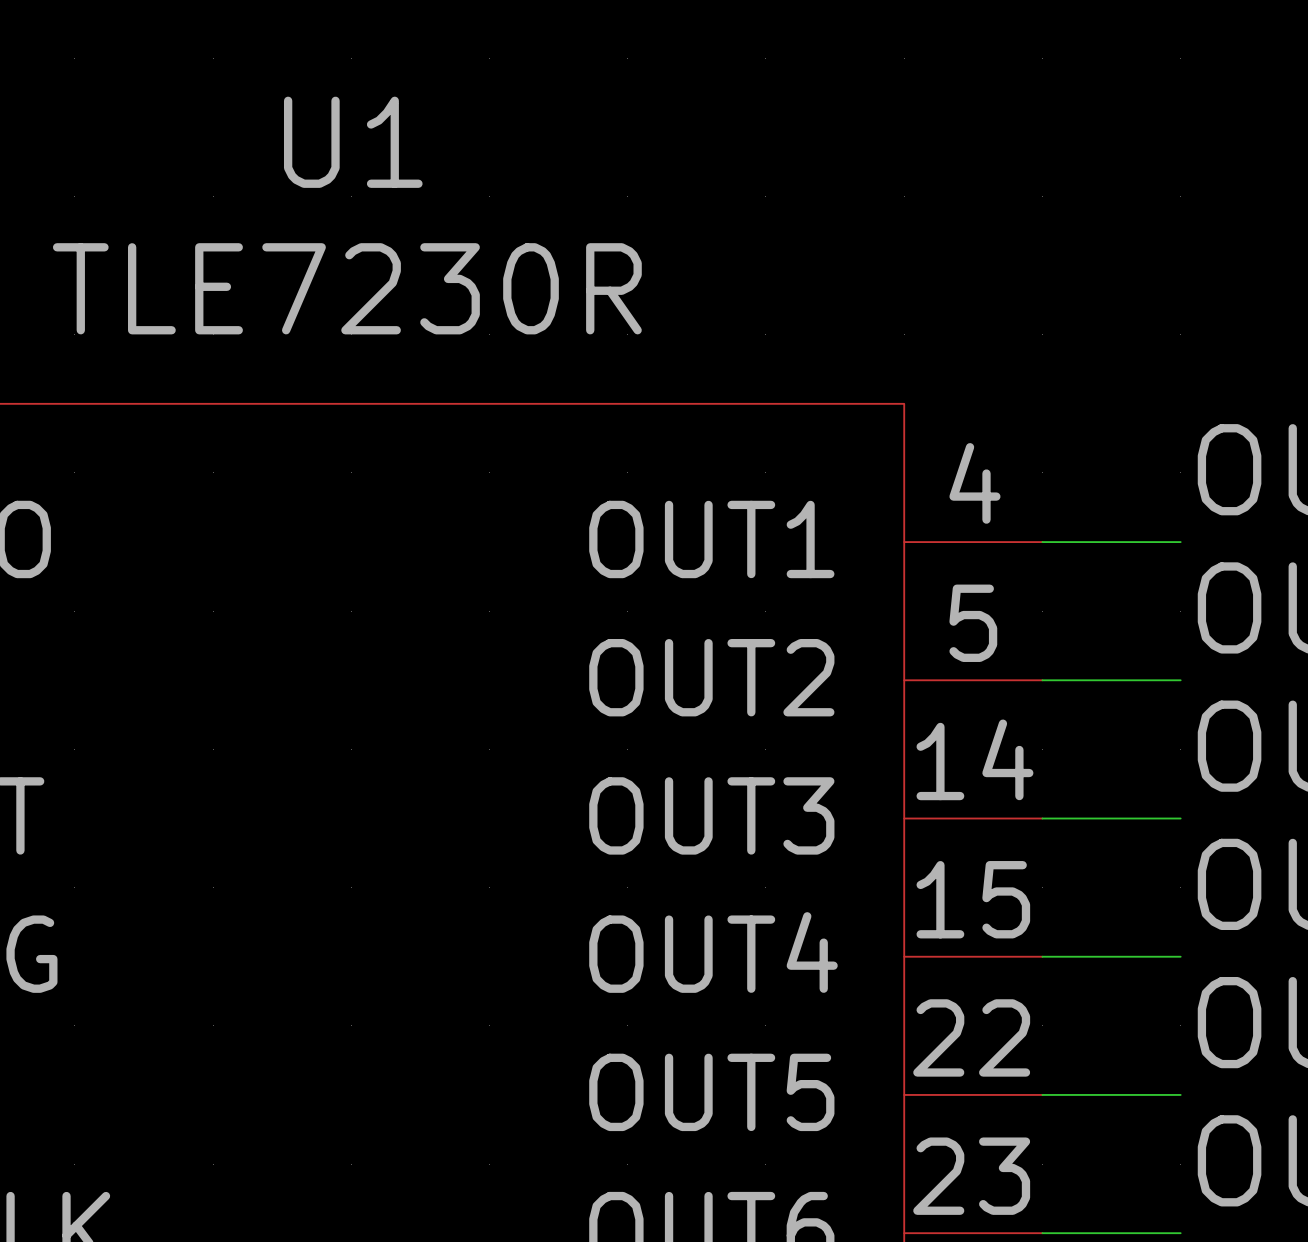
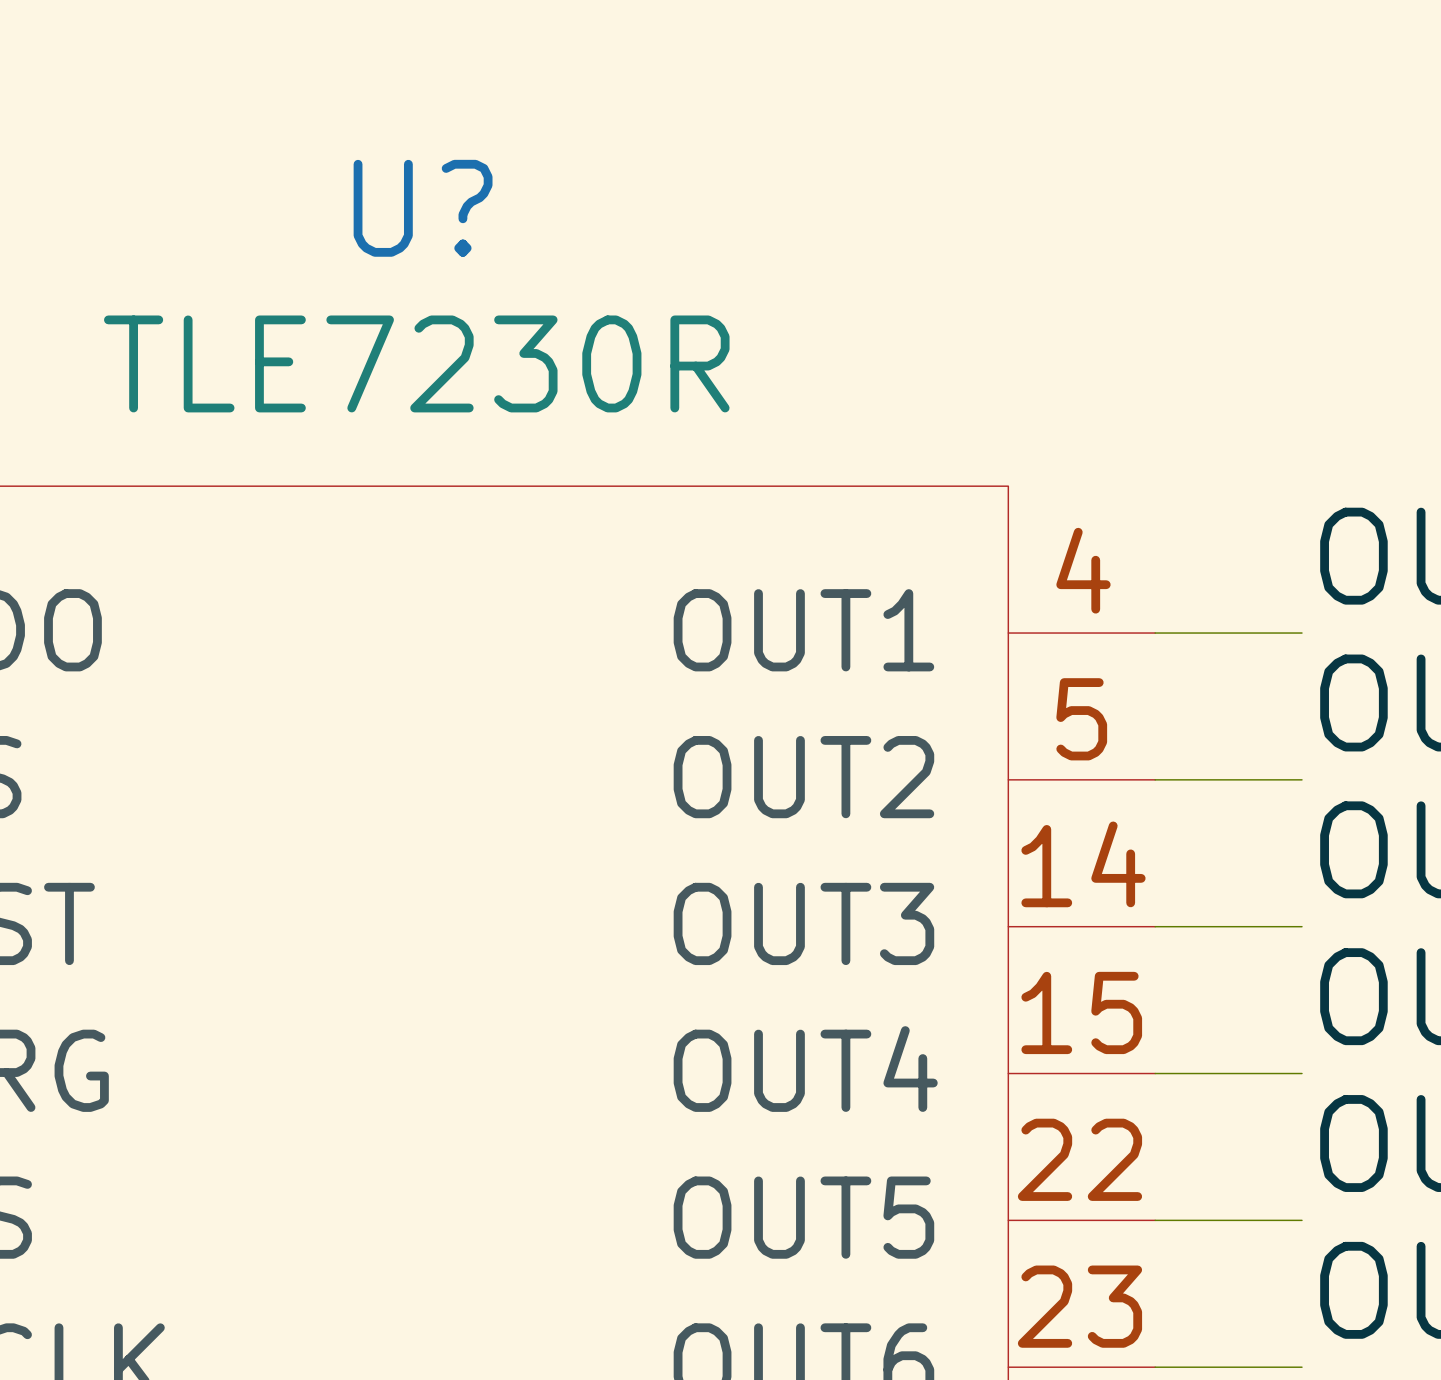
U1 name: U1 (353, 142) -> U? (423, 208)

